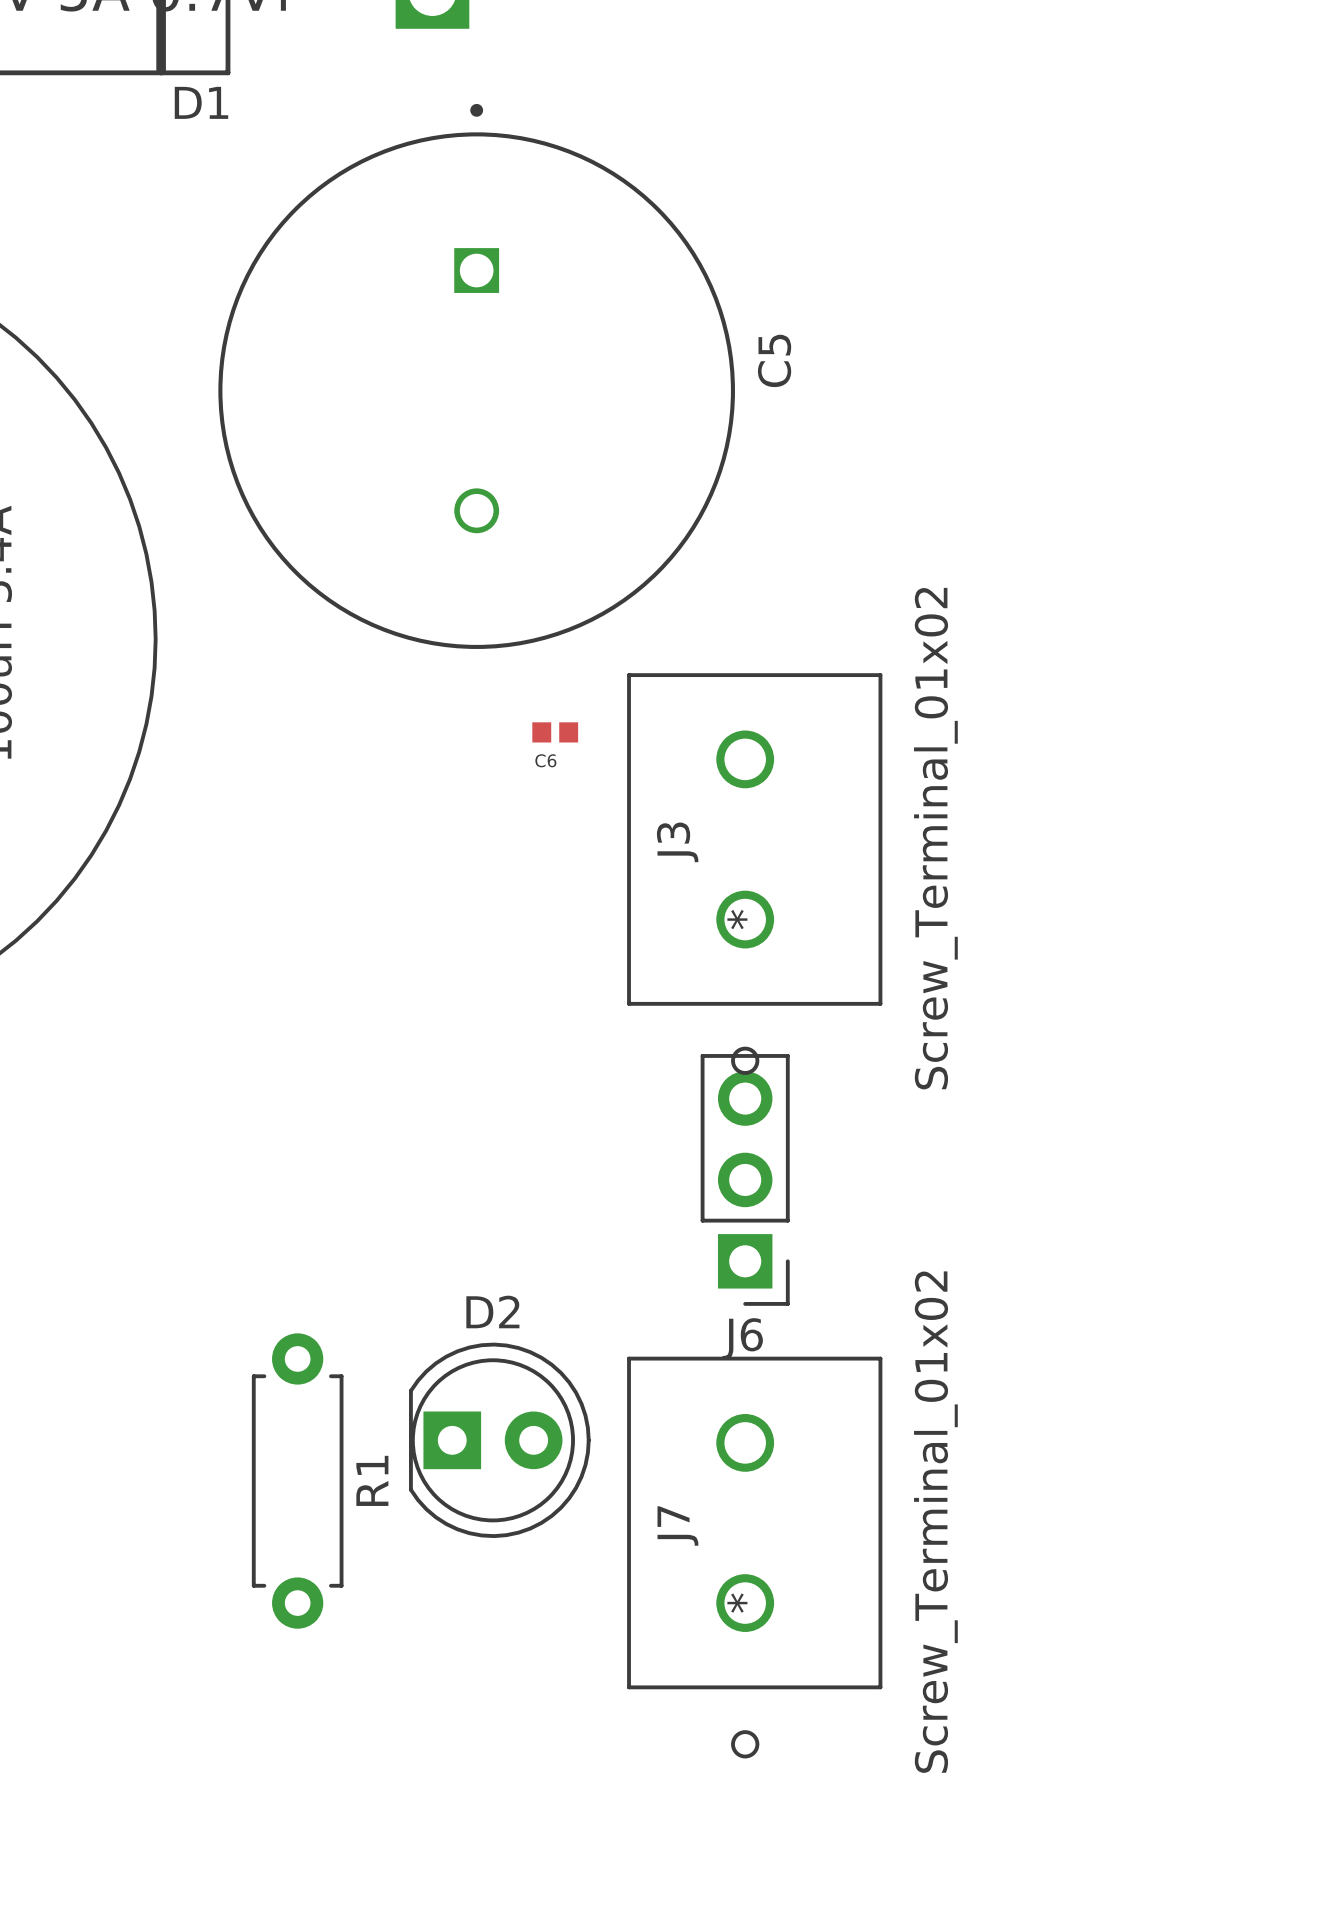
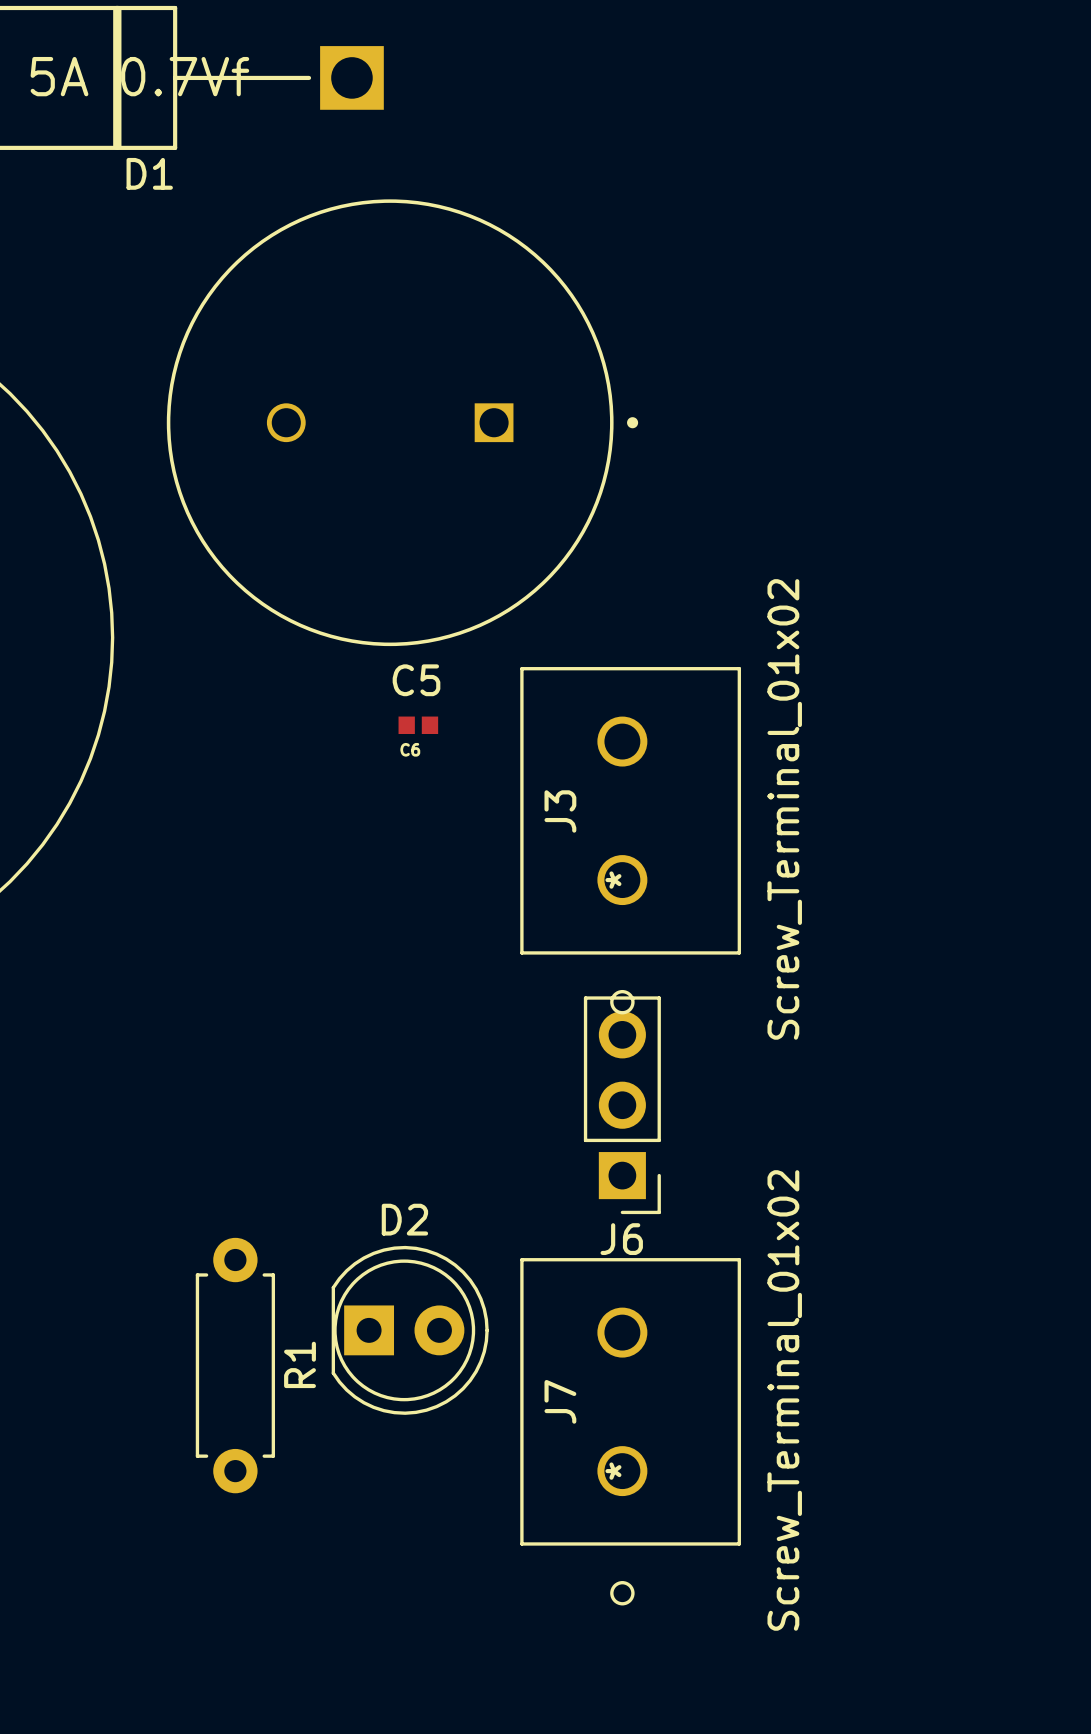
C5 rotation: 0° (476, 376) -> 90° clockwise (402, 422)
C6 position: (555, 732) -> (418, 725)

